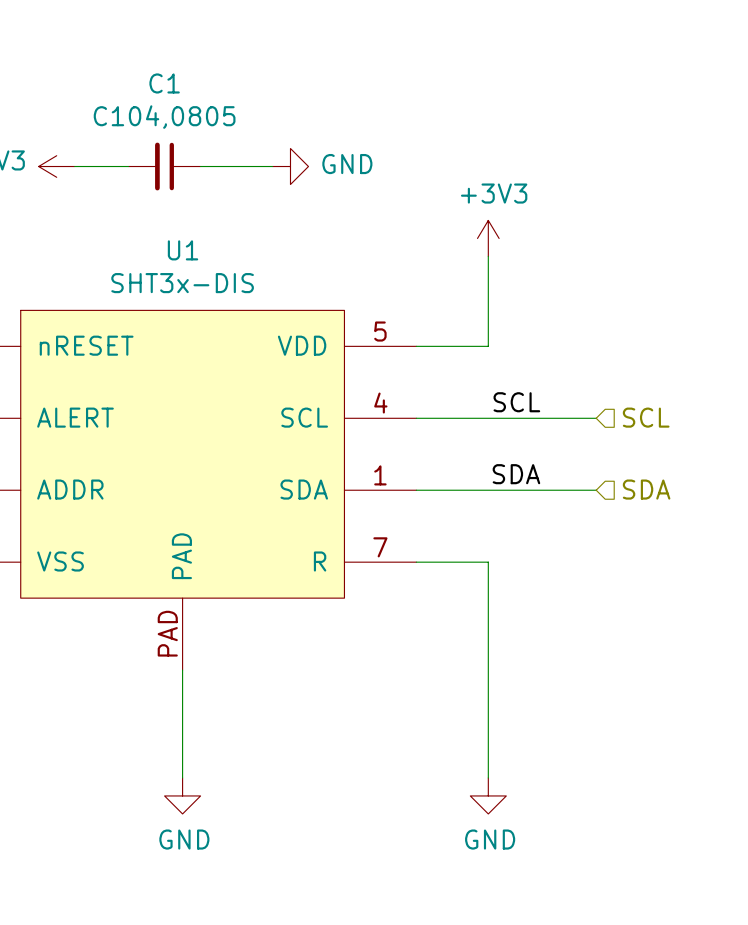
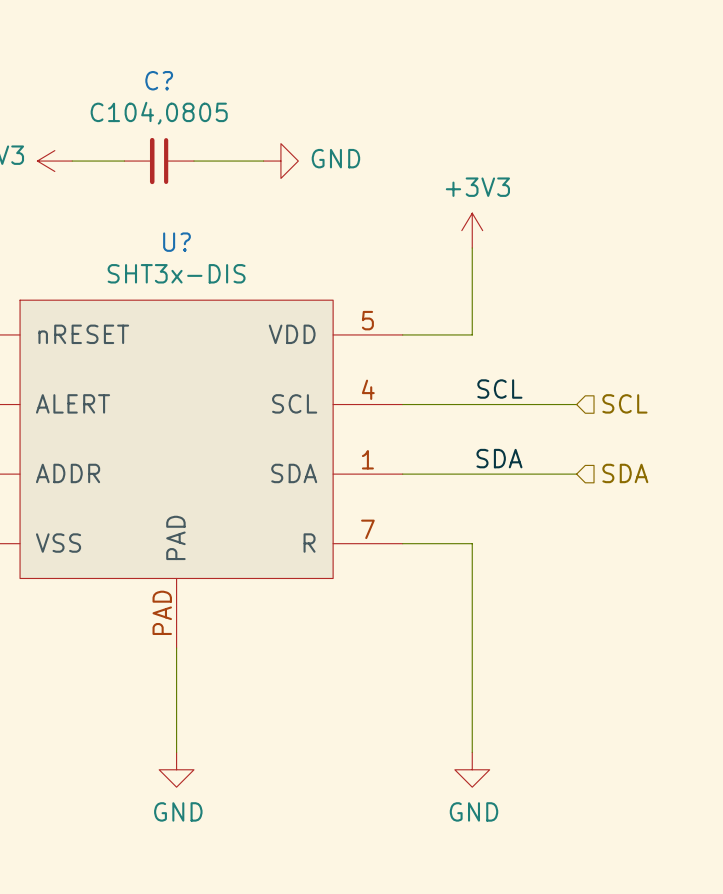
C1 name: C1 (164, 83) -> C? (159, 80)
U1 name: U1 (183, 250) -> U? (176, 242)

